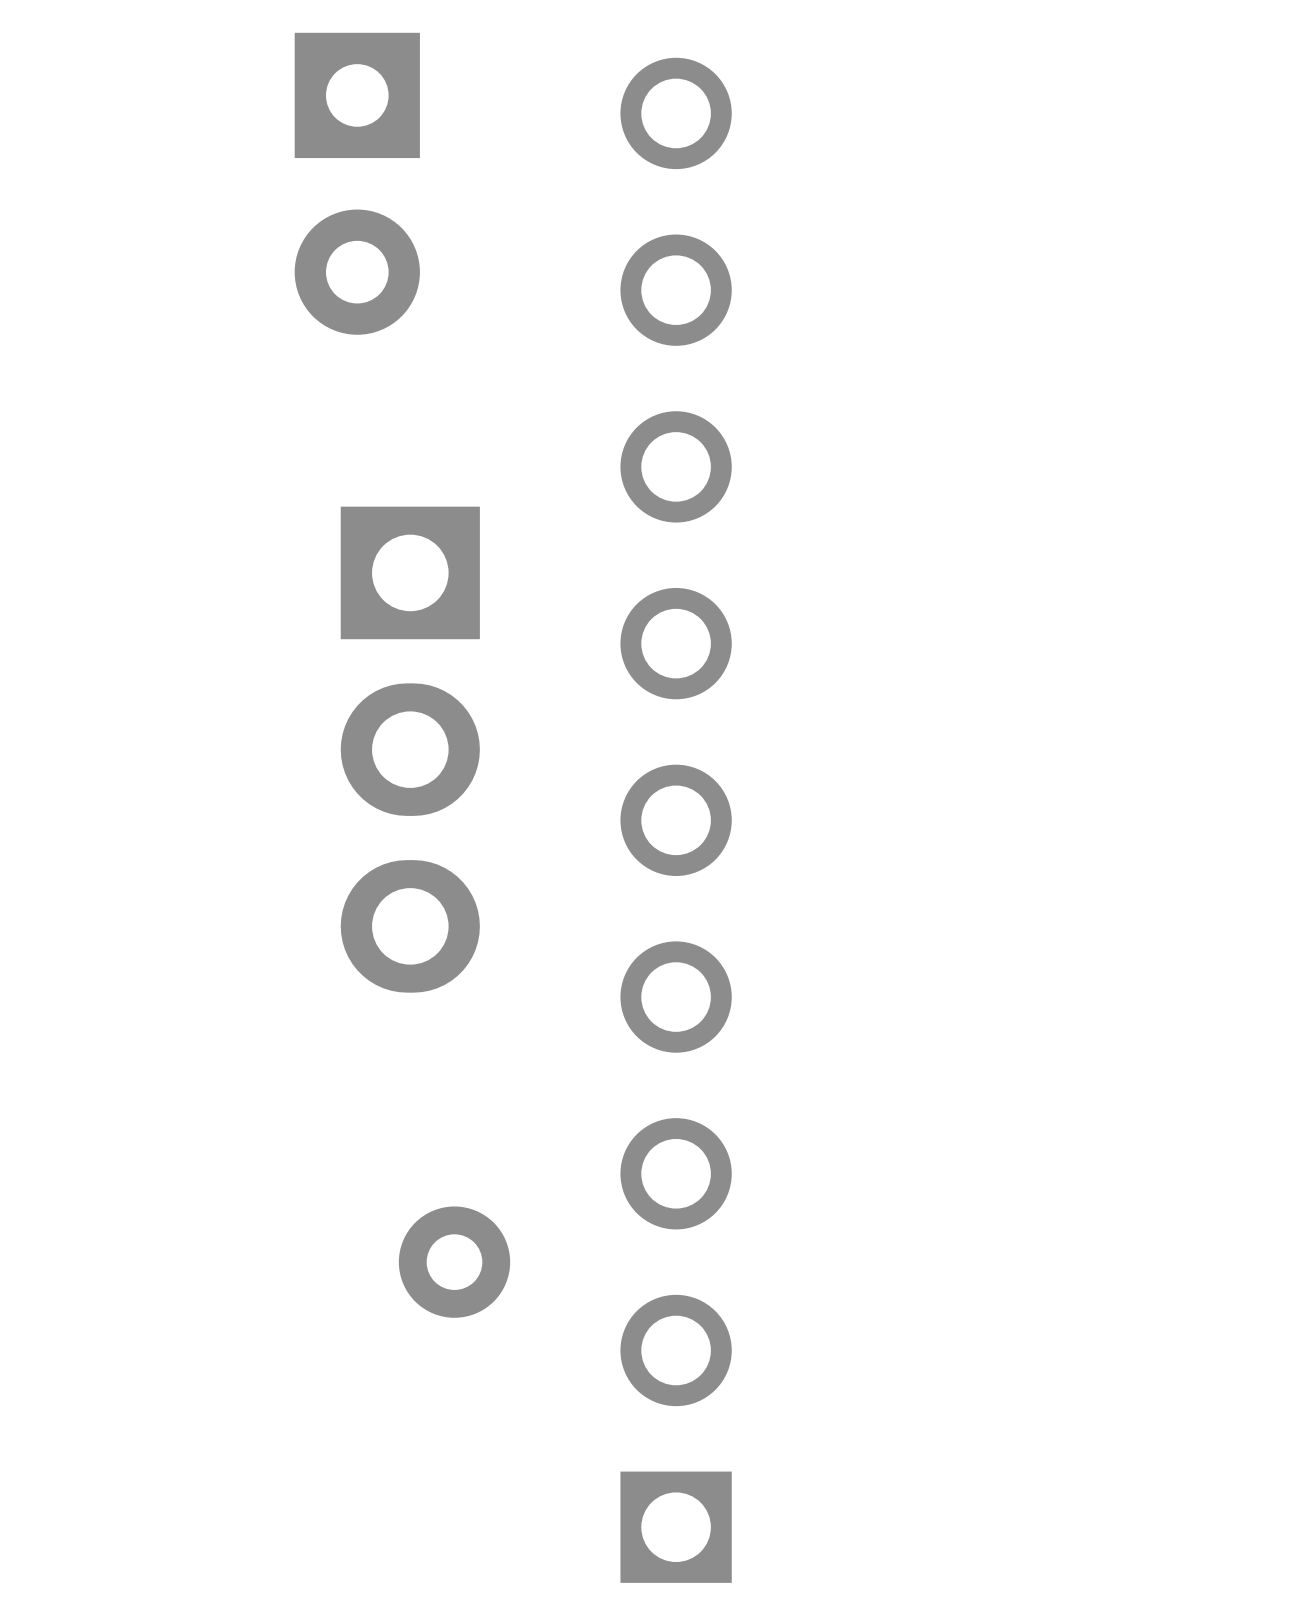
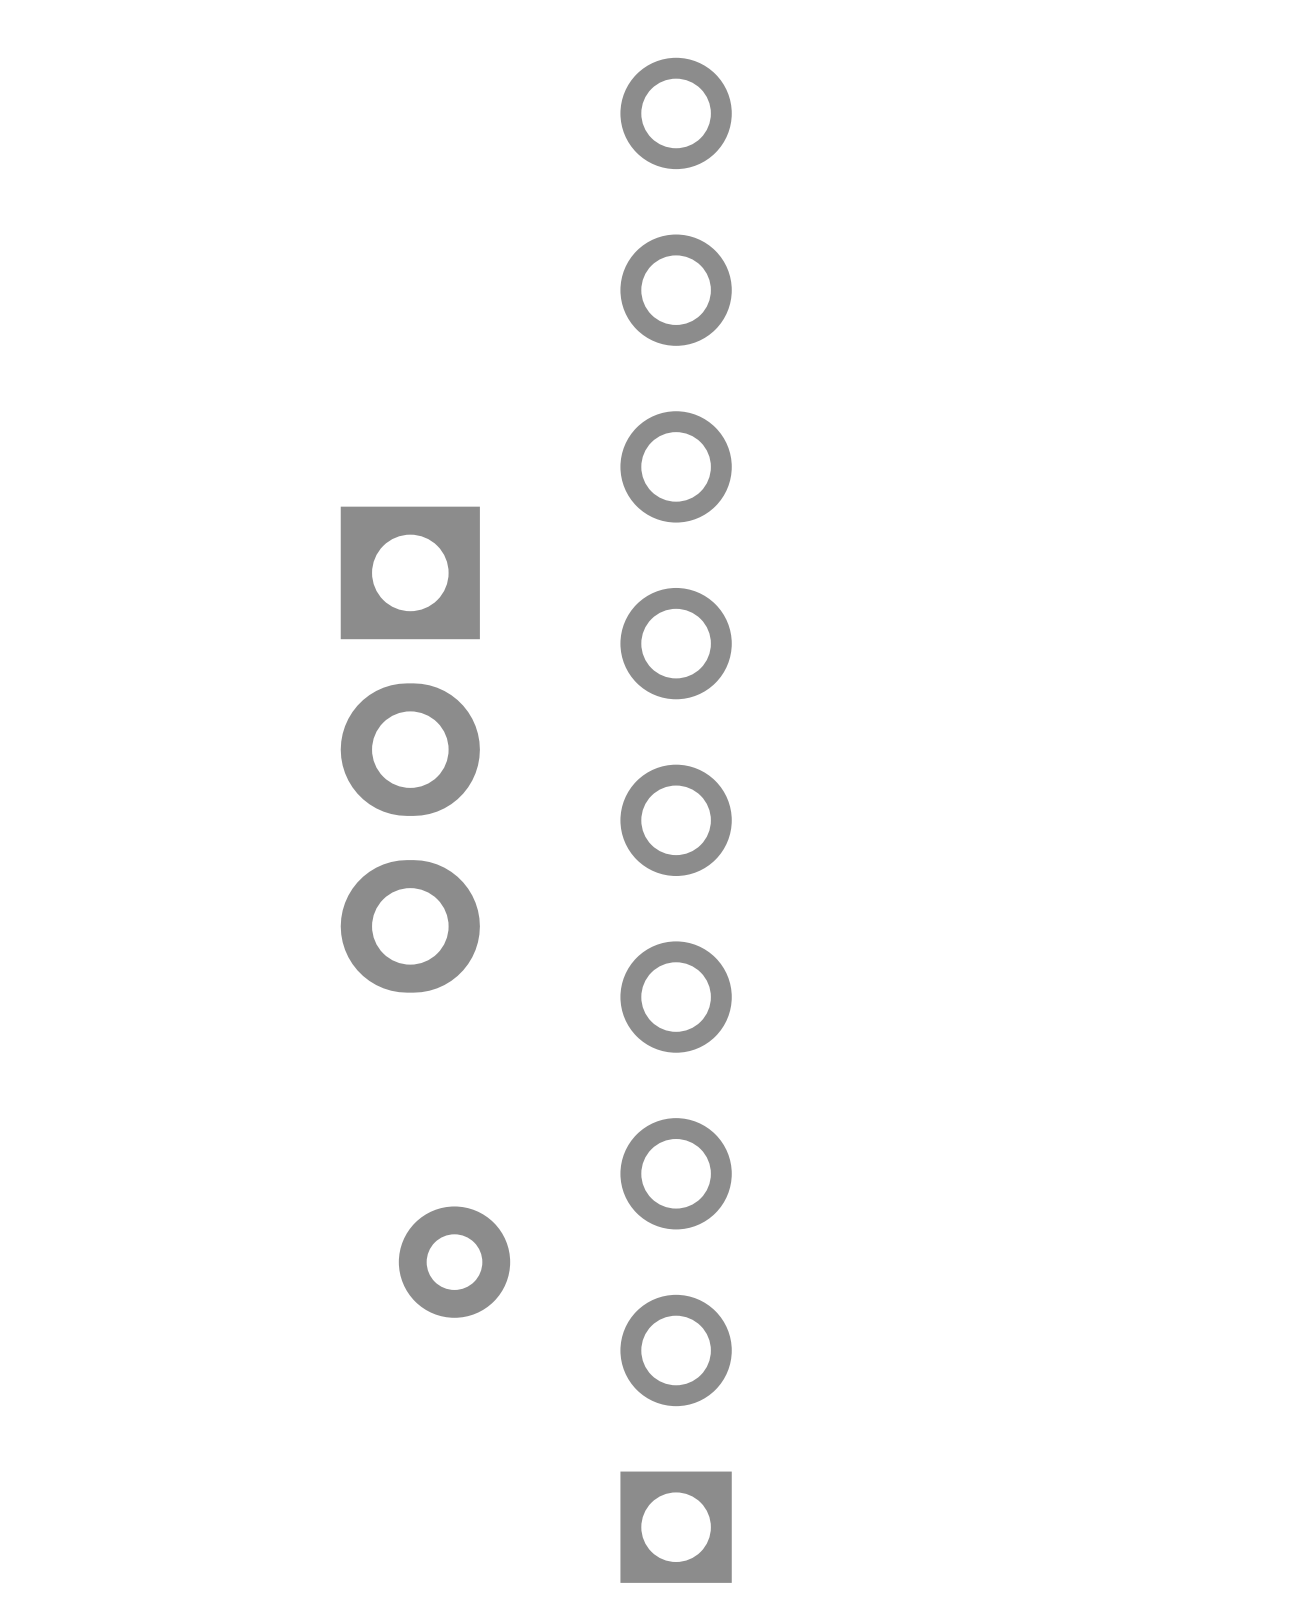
part: (357, 183) -> none

